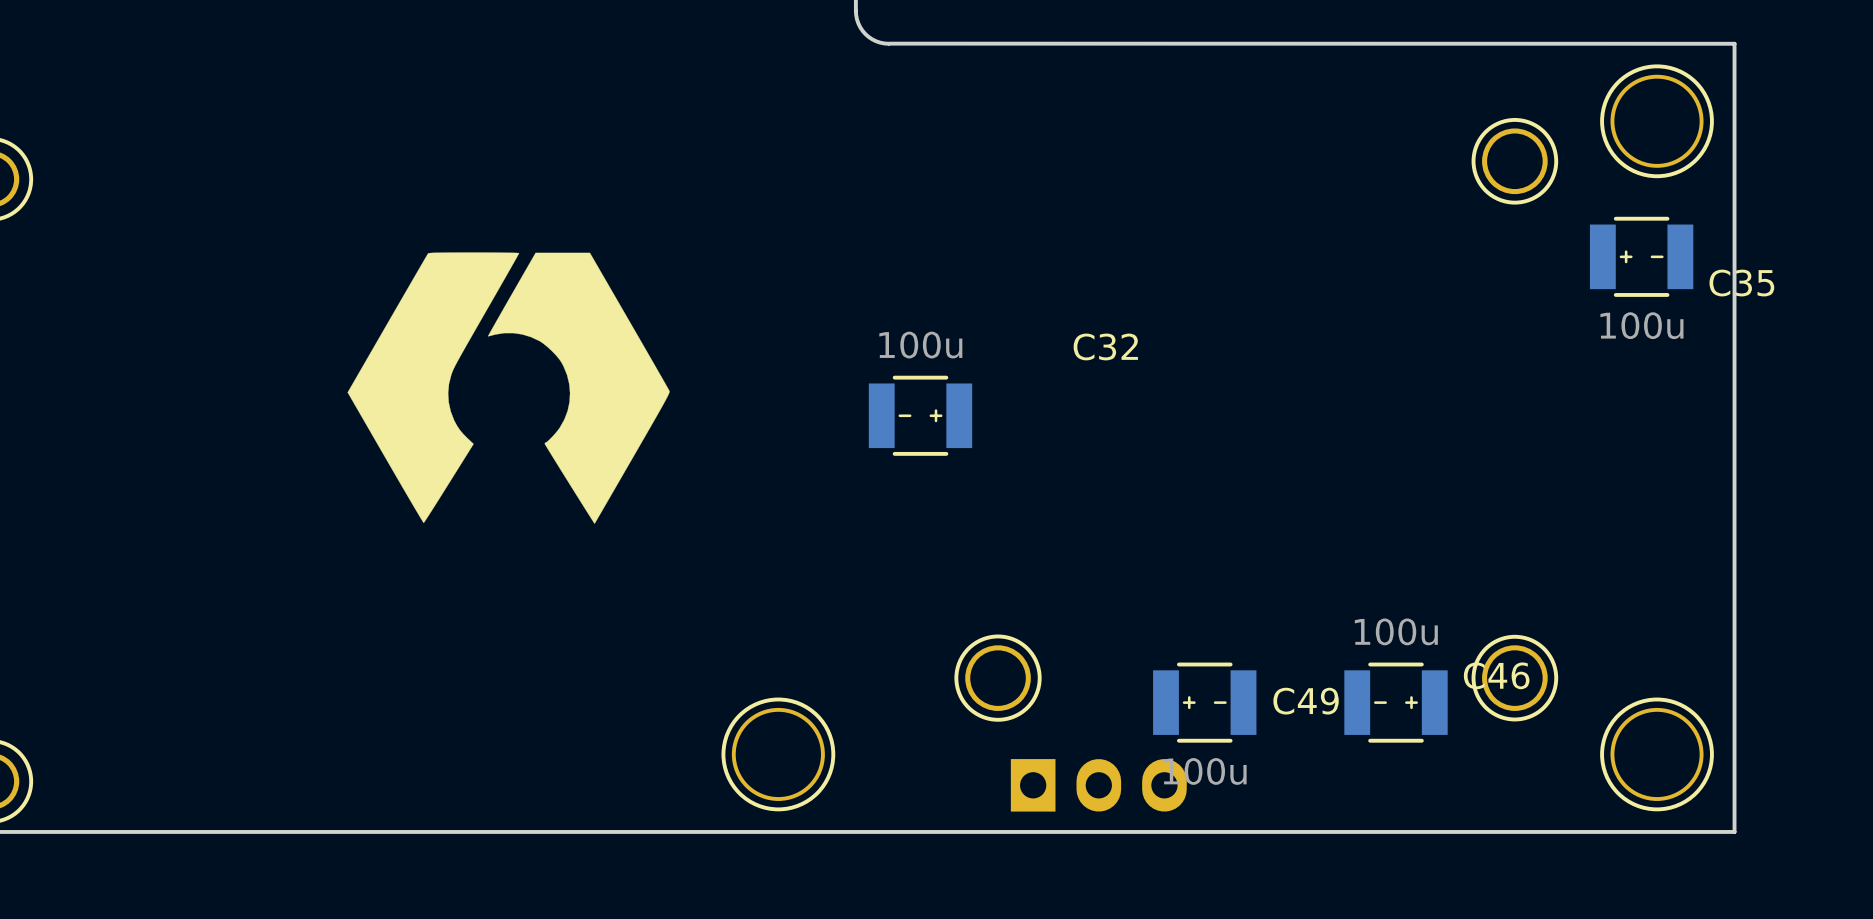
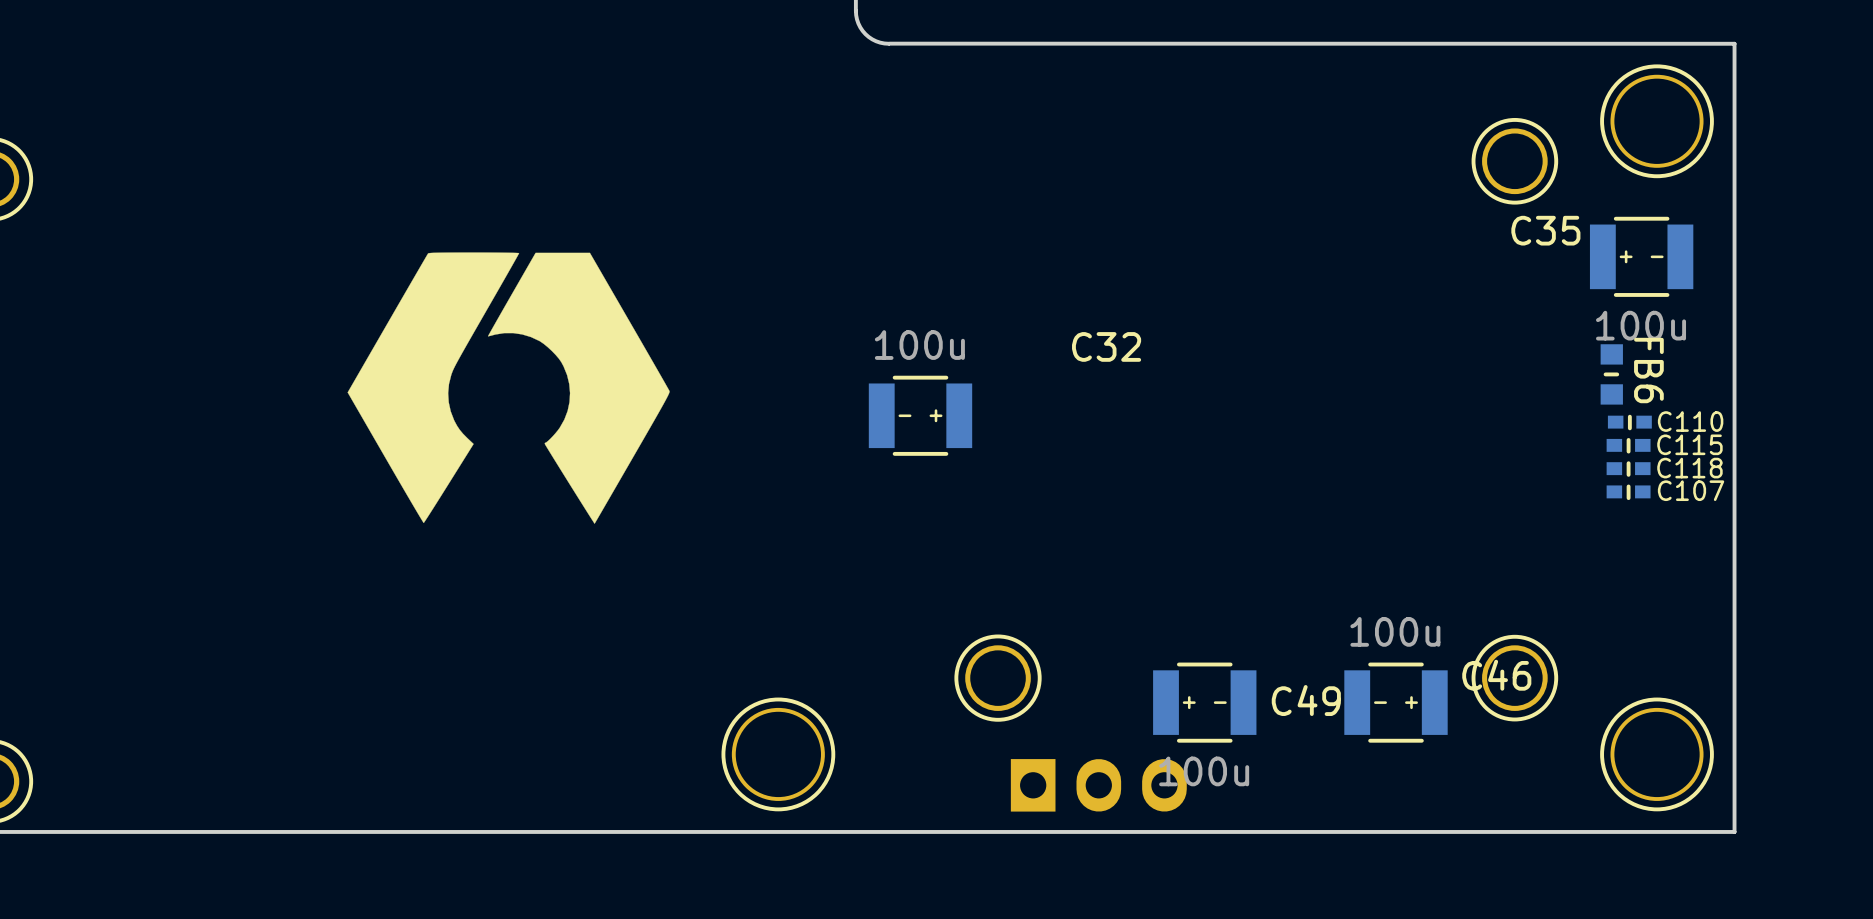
C35 name position: C35 (1741, 283) -> C35 (1545, 230)
FB6: none -> (1611, 374)
C110: none -> (1629, 422)
C115: none -> (1628, 445)
C118: none -> (1628, 469)
C107: none -> (1628, 492)

